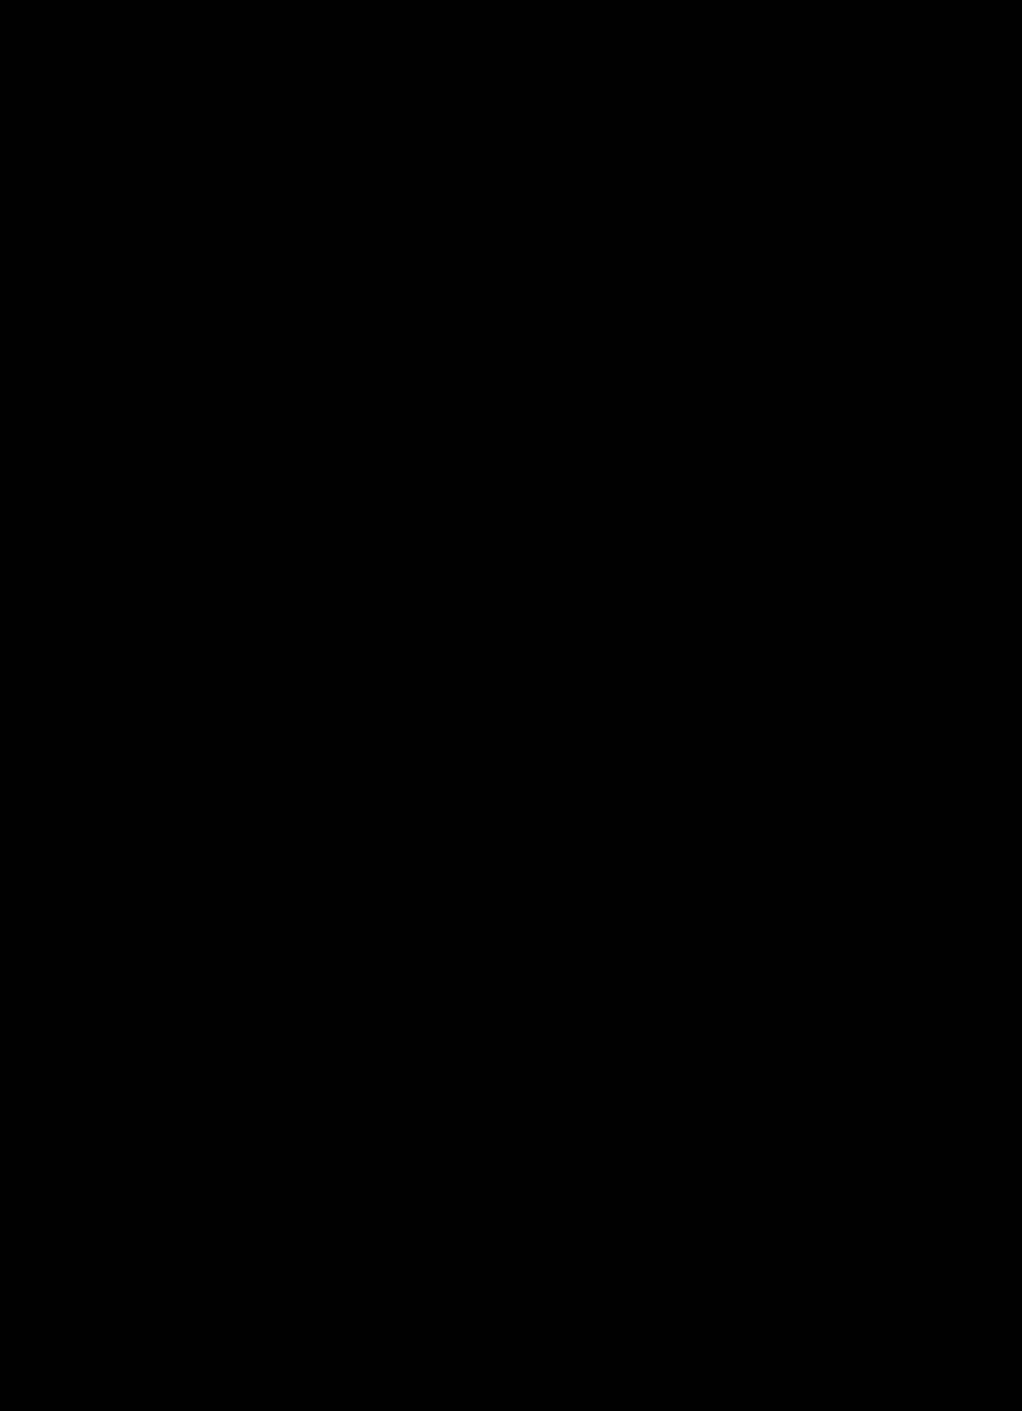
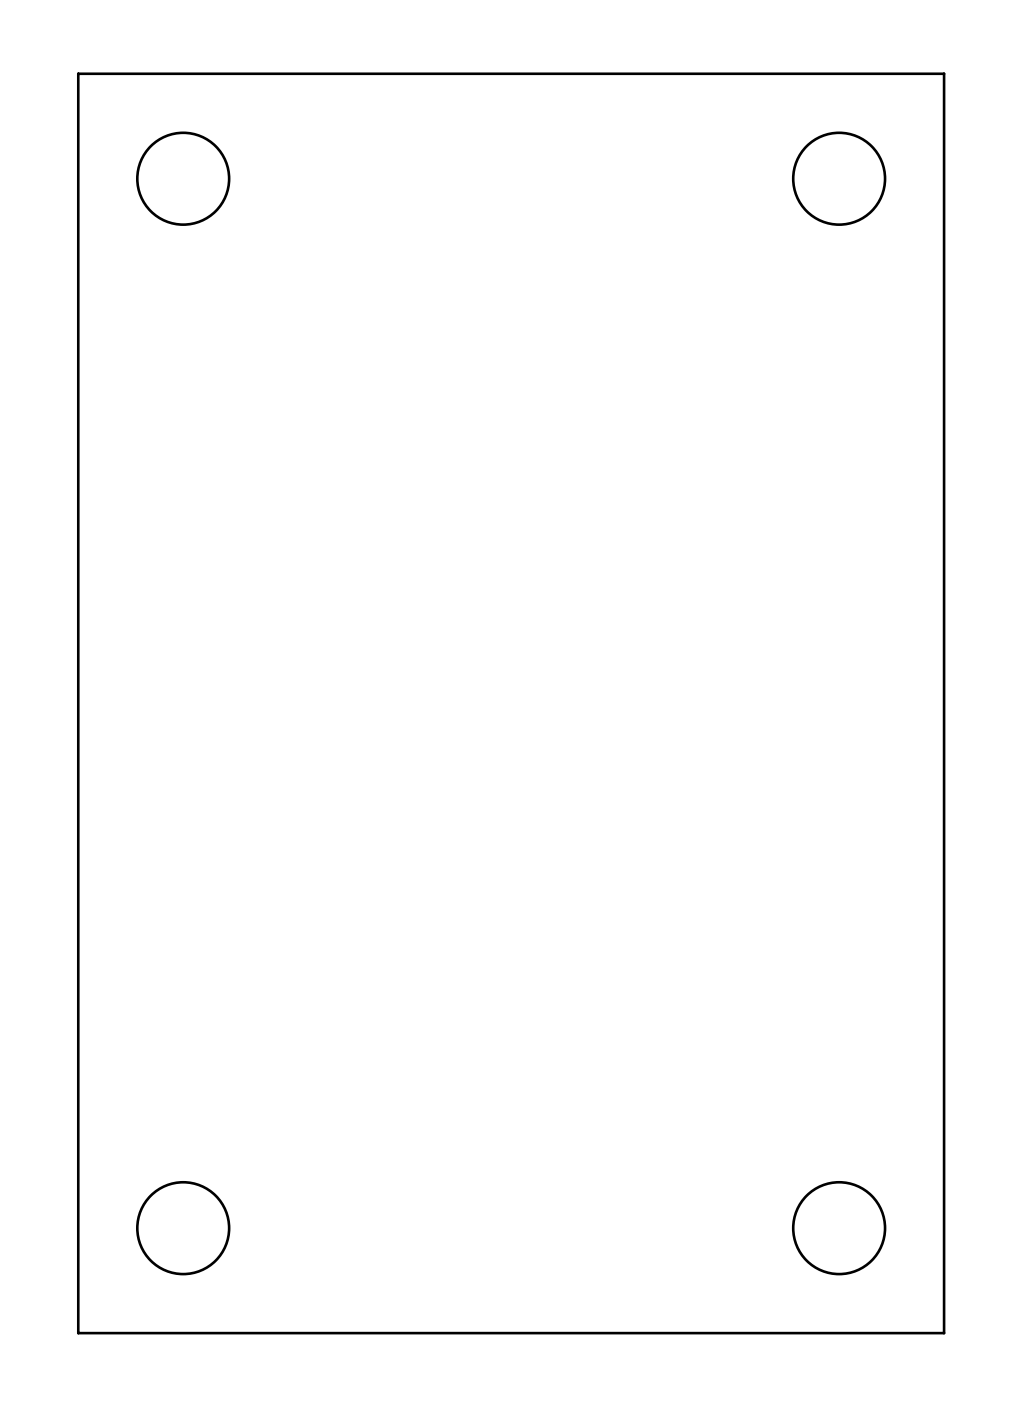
board edge: none -> (944, 73) (78, 73) (78, 1333) (944, 1333) (944, 73)
round board edge: none -> [135, 131, 231, 226]
round board edge: none -> [791, 131, 887, 226]
round board edge: none -> [135, 1180, 231, 1276]
round board edge: none -> [791, 1180, 887, 1276]

